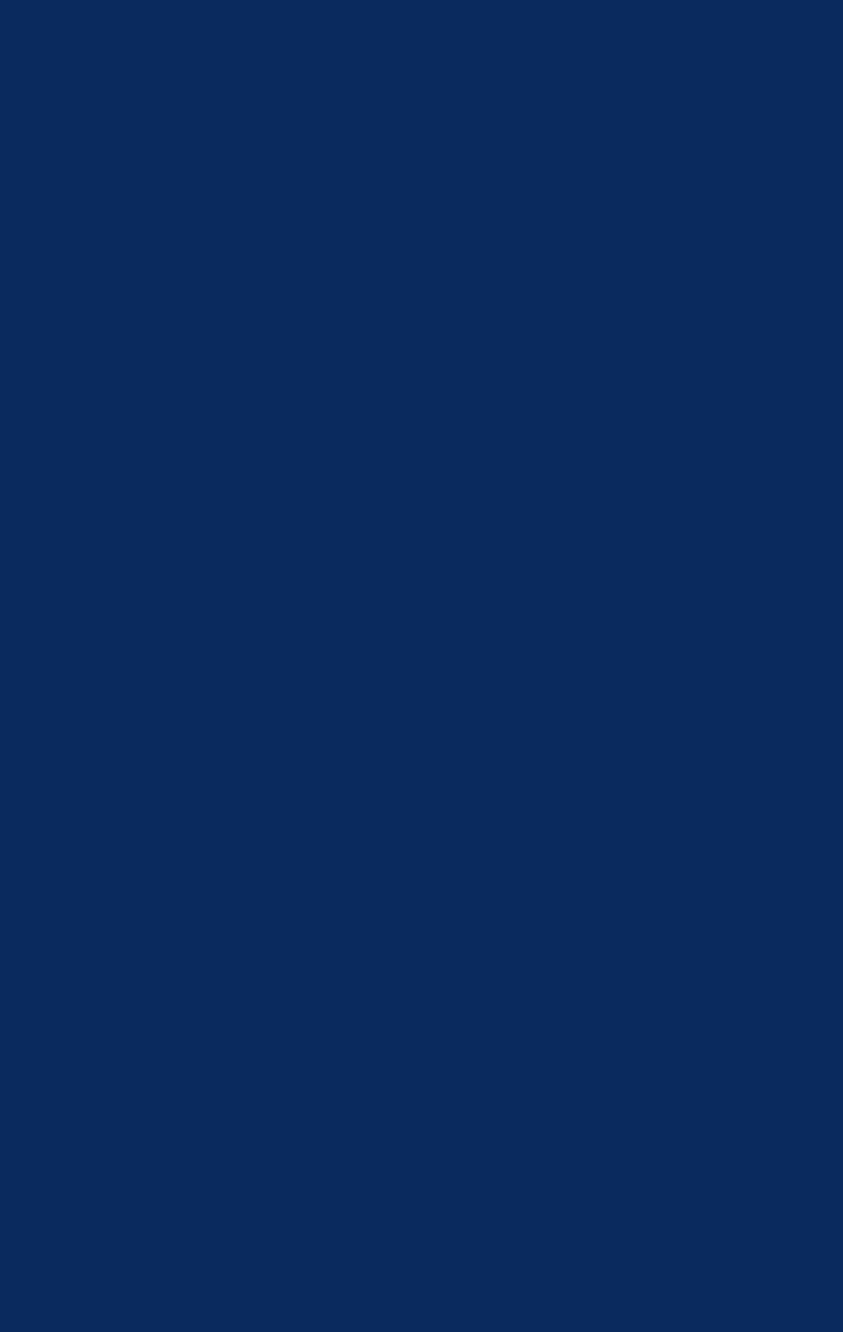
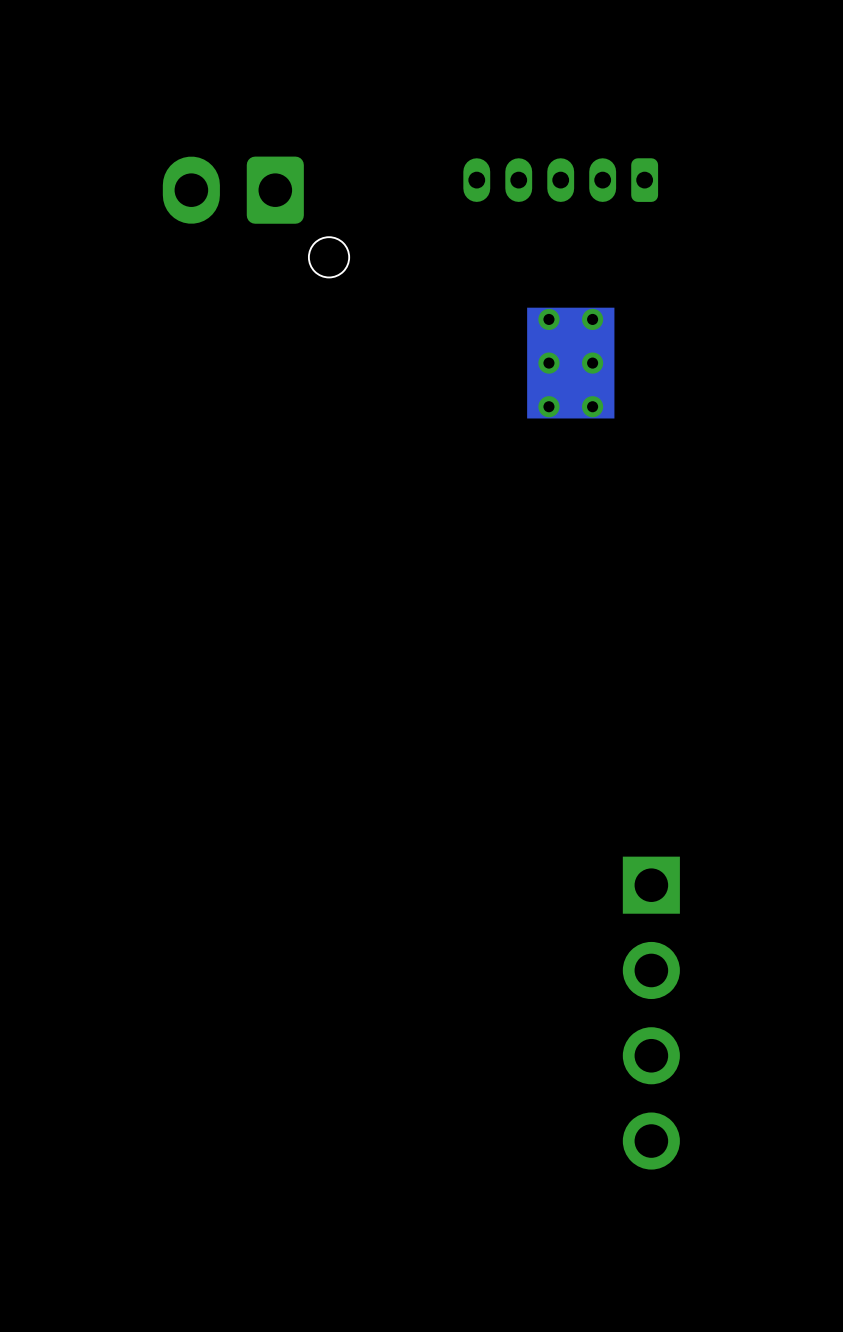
part: none -> (560, 180)
part: none -> (256, 217)
part: none -> (570, 363)
part: none -> (651, 1013)

